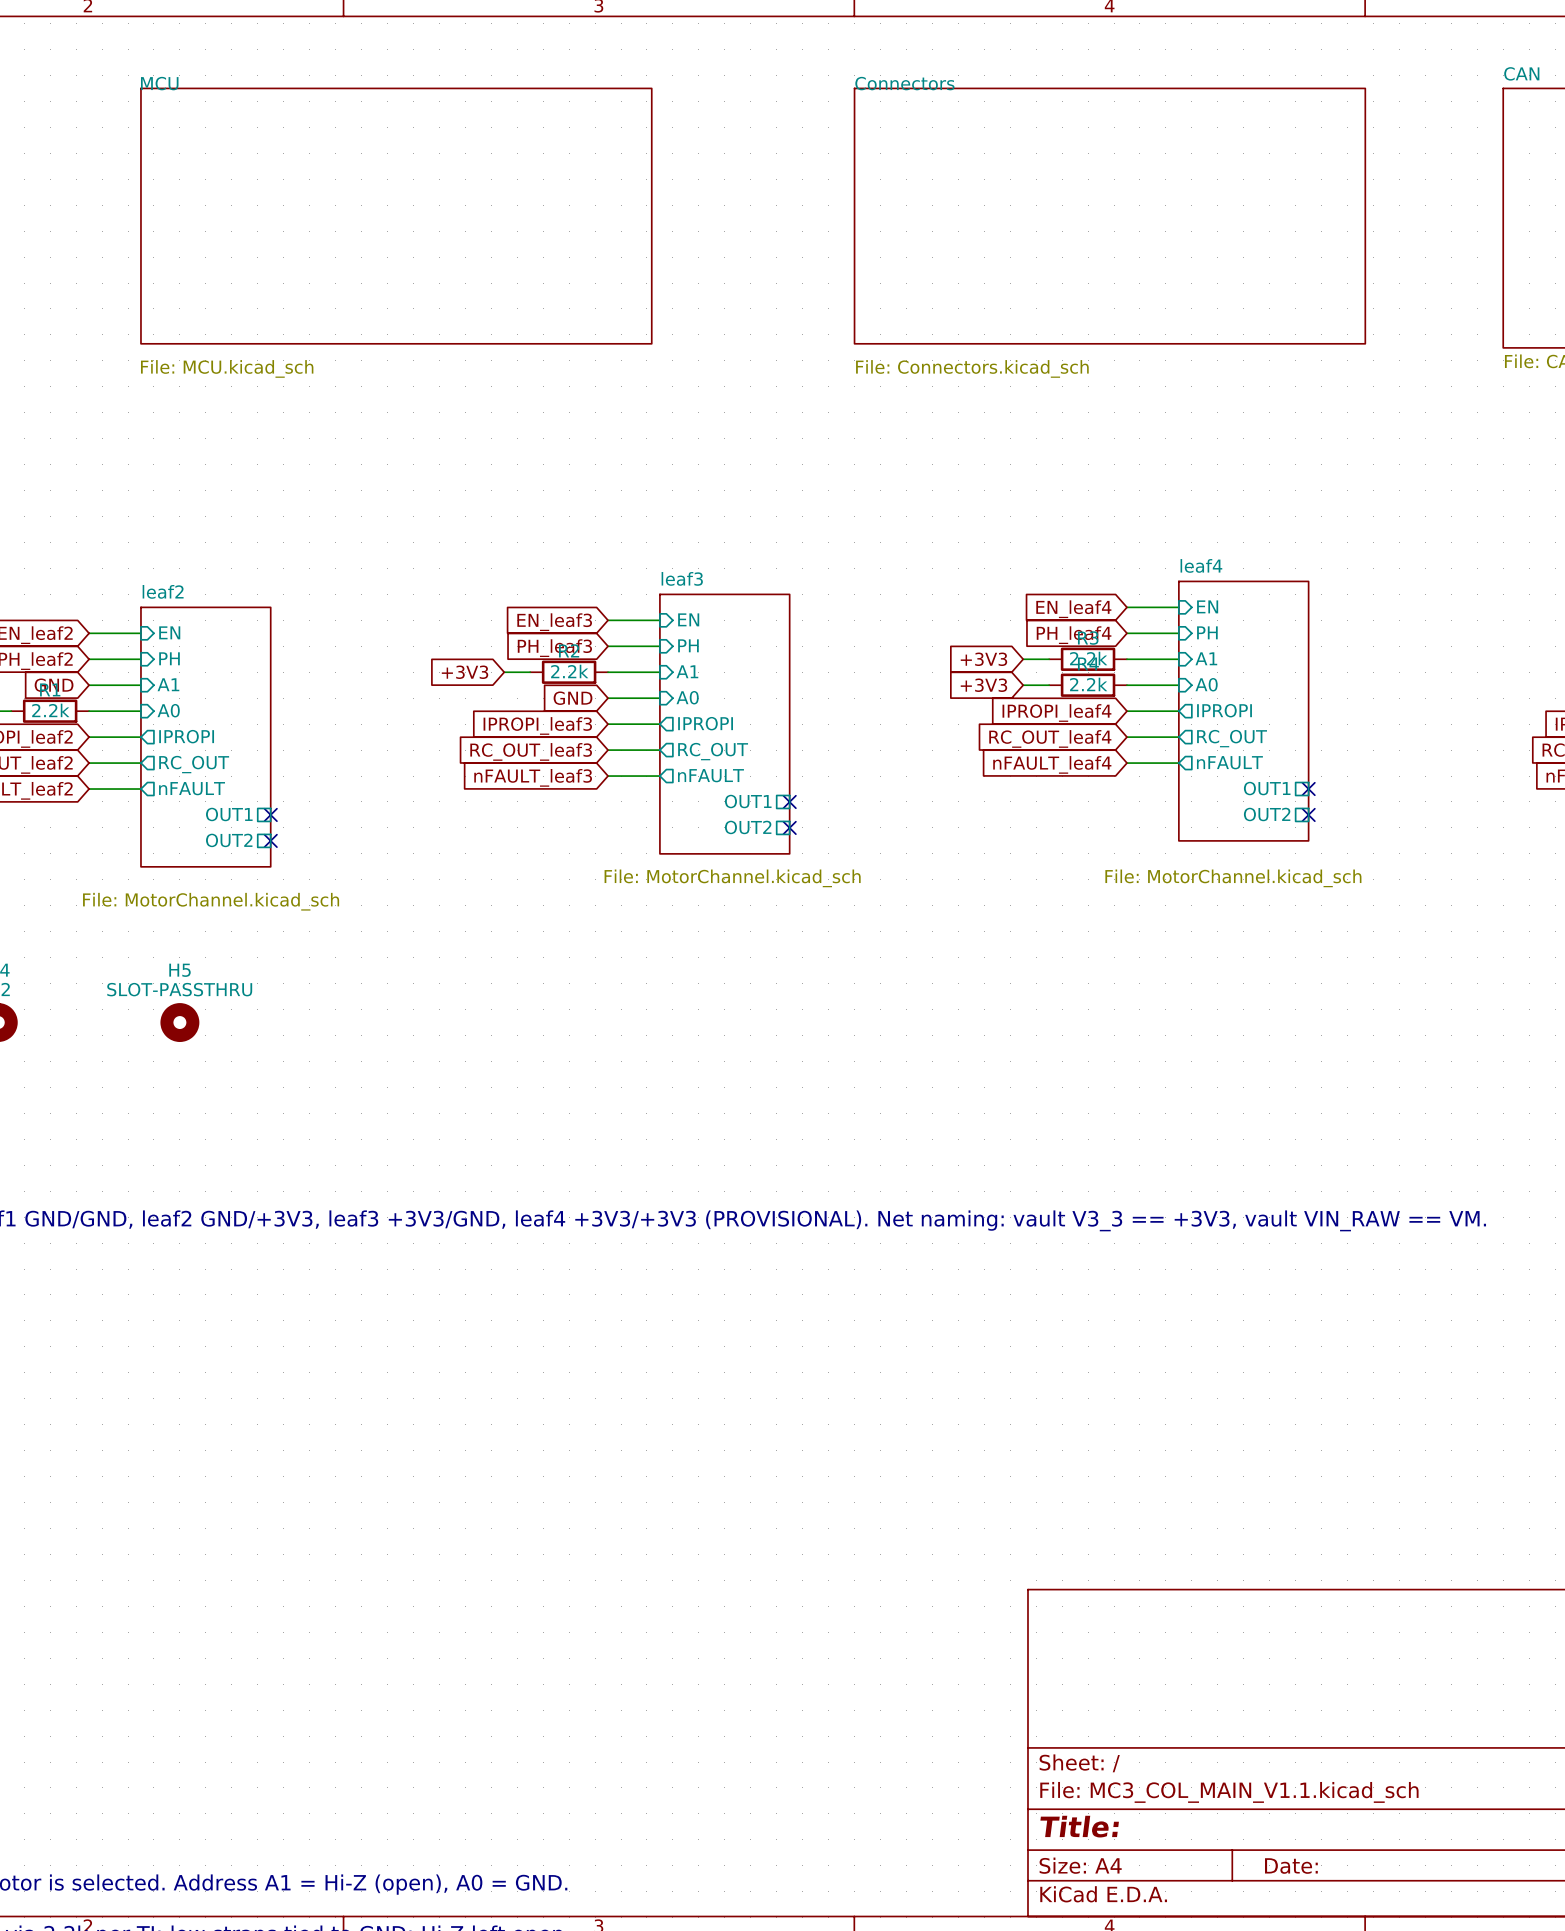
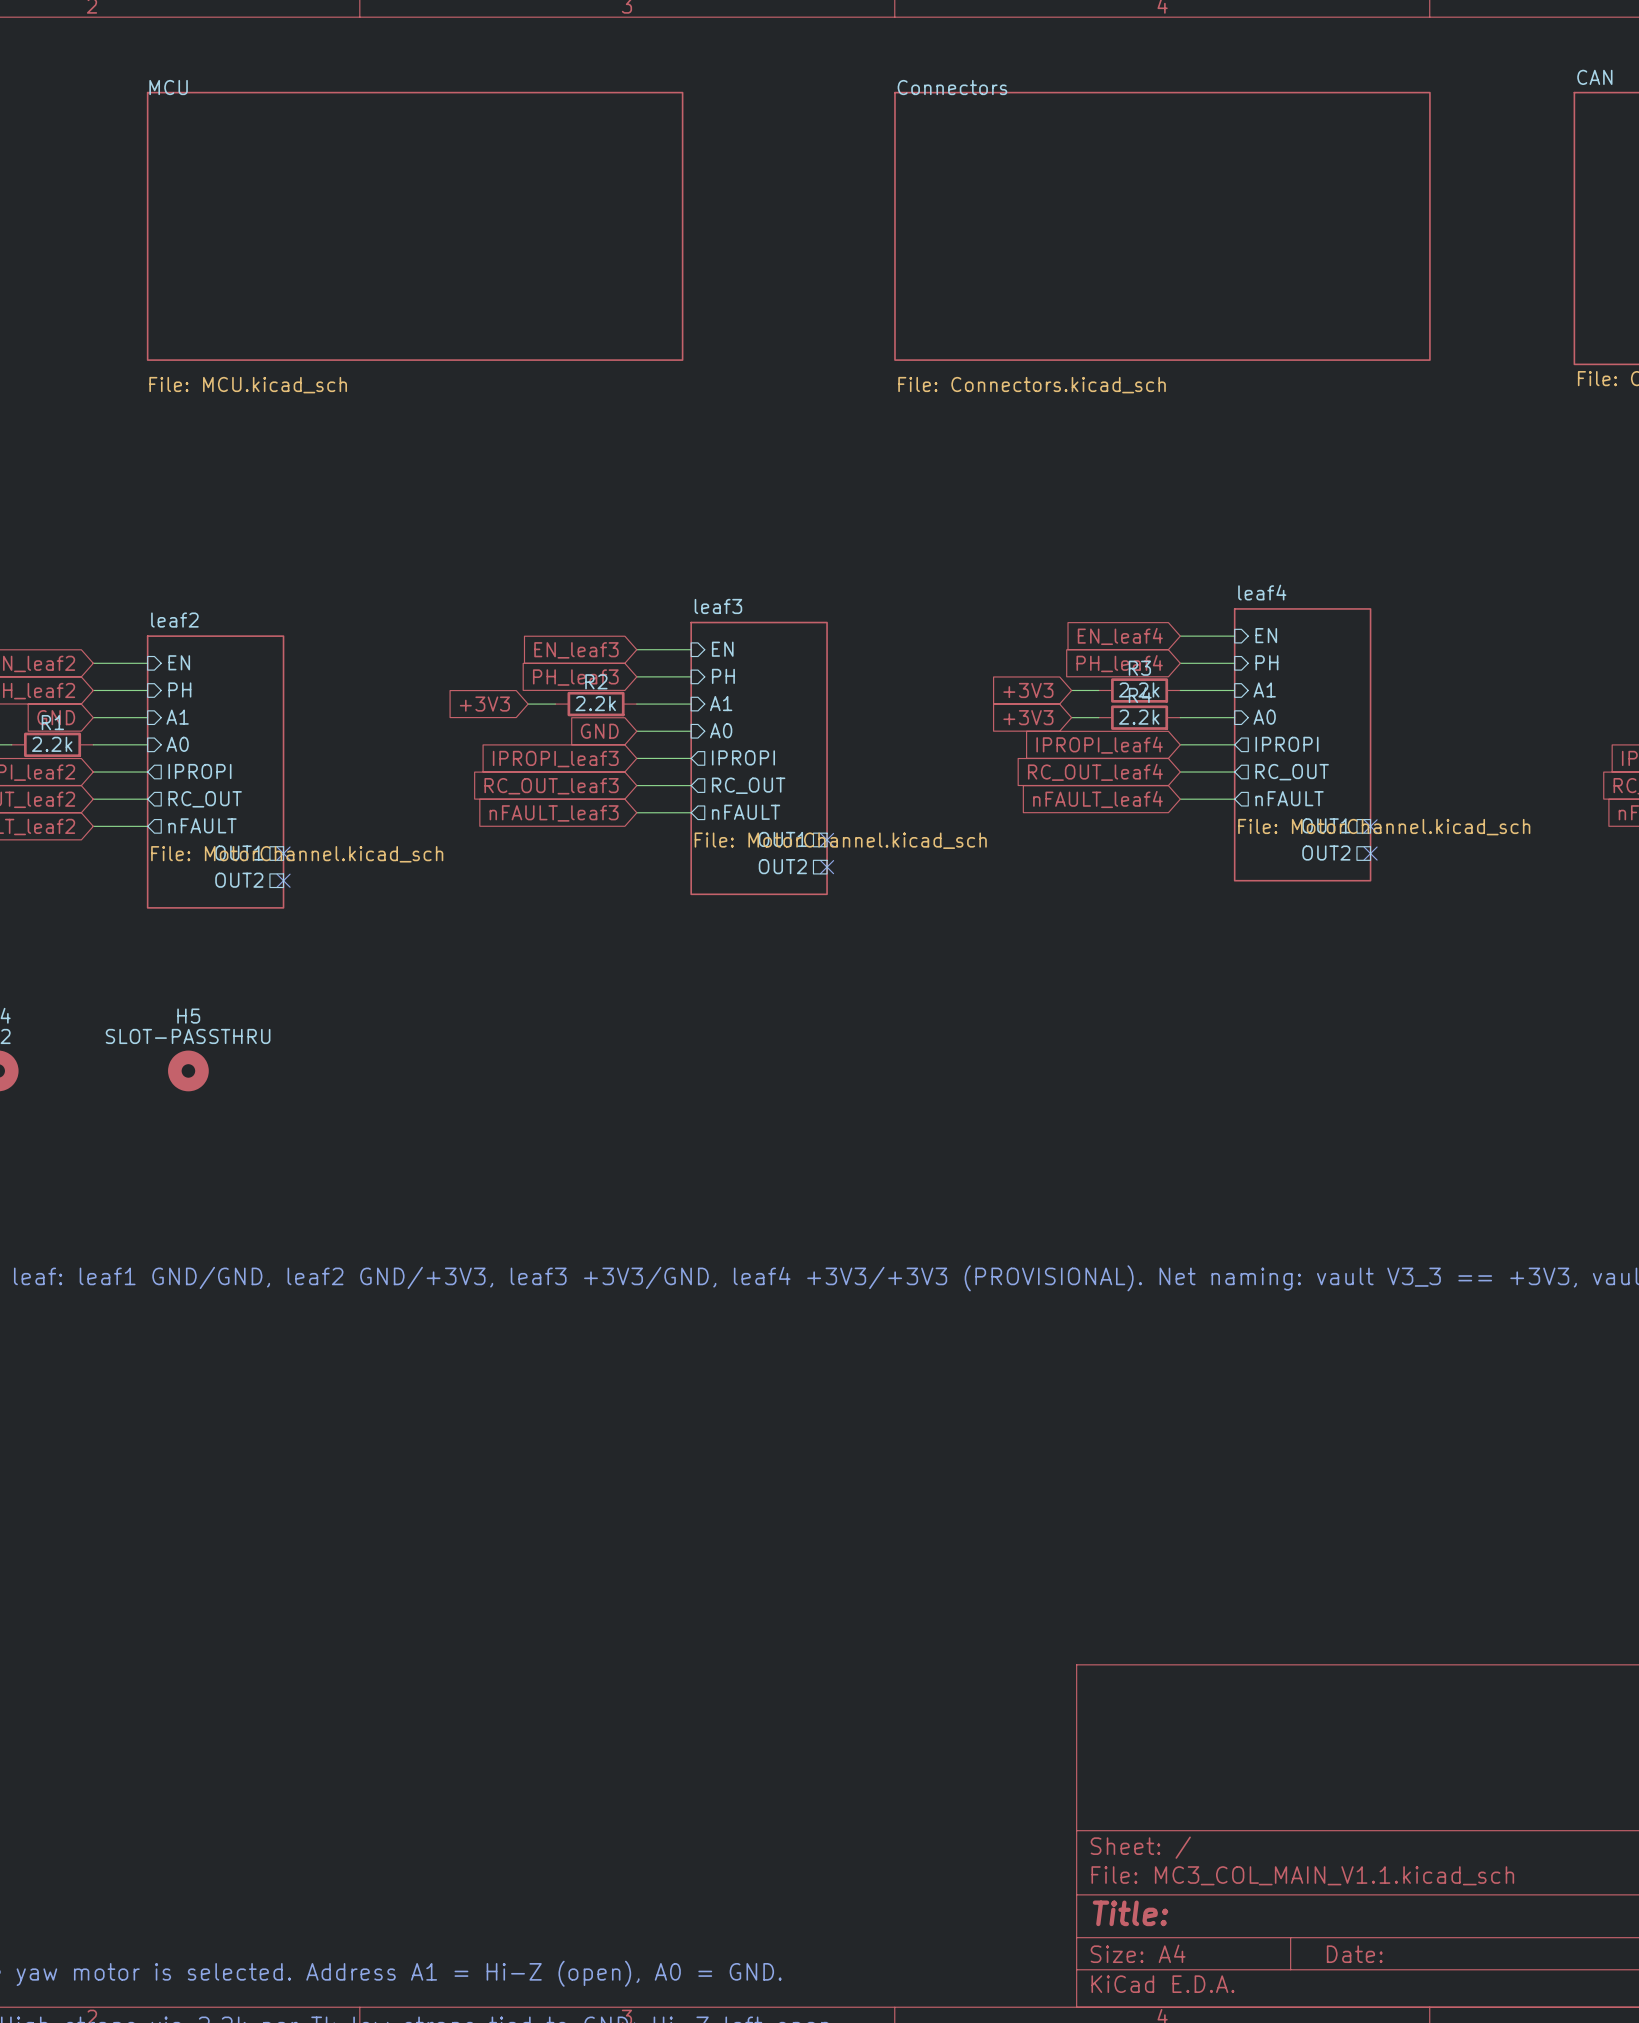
sheet leaf3 value position: File: MotorChannel.kicad_sch (732, 878) -> File: MotorChannel.kicad_sch (840, 840)
sheet leaf4 value position: File: MotorChannel.kicad_sch (1233, 878) -> File: MotorChannel.kicad_sch (1384, 827)
sheet leaf2 value position: File: MotorChannel.kicad_sch (211, 901) -> File: MotorChannel.kicad_sch (297, 854)

